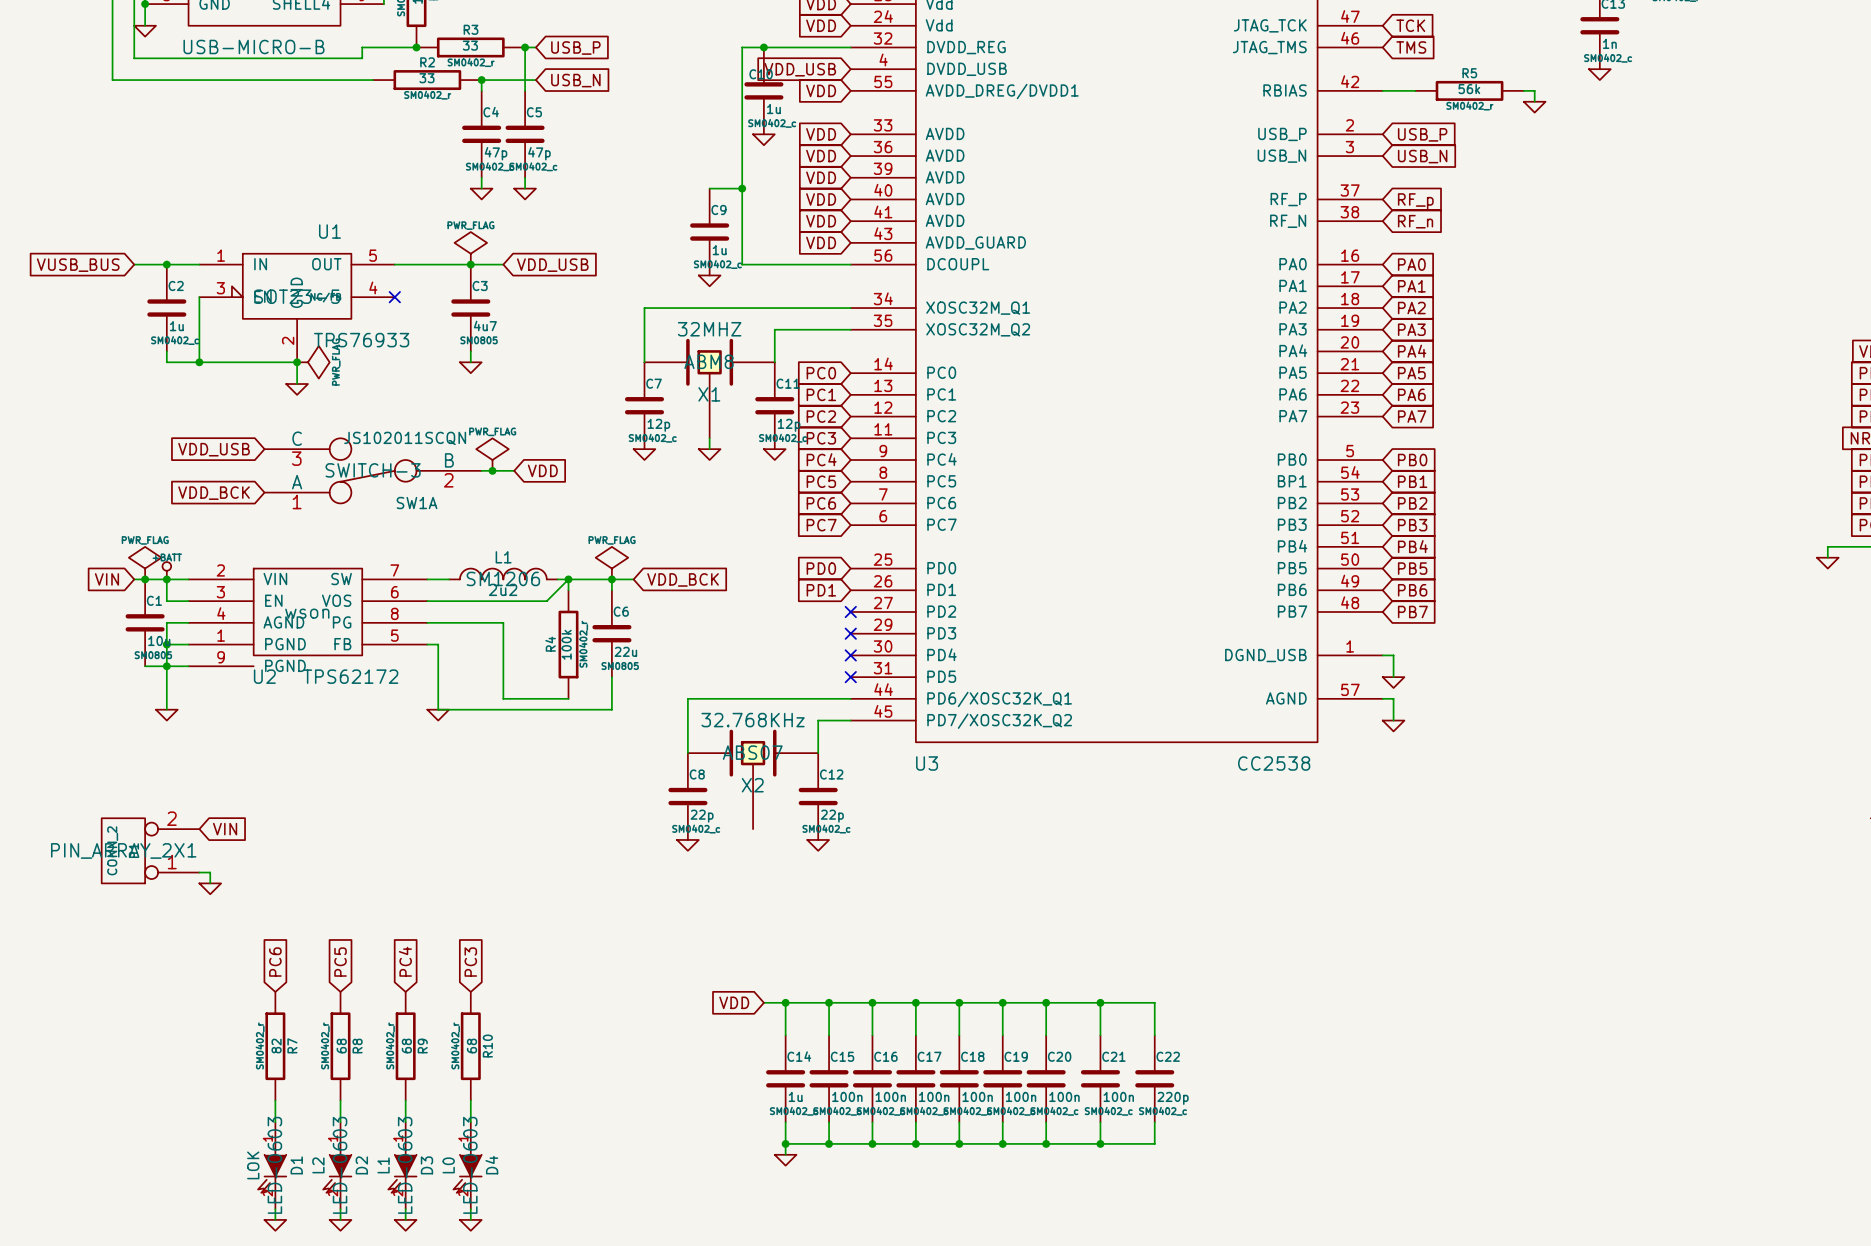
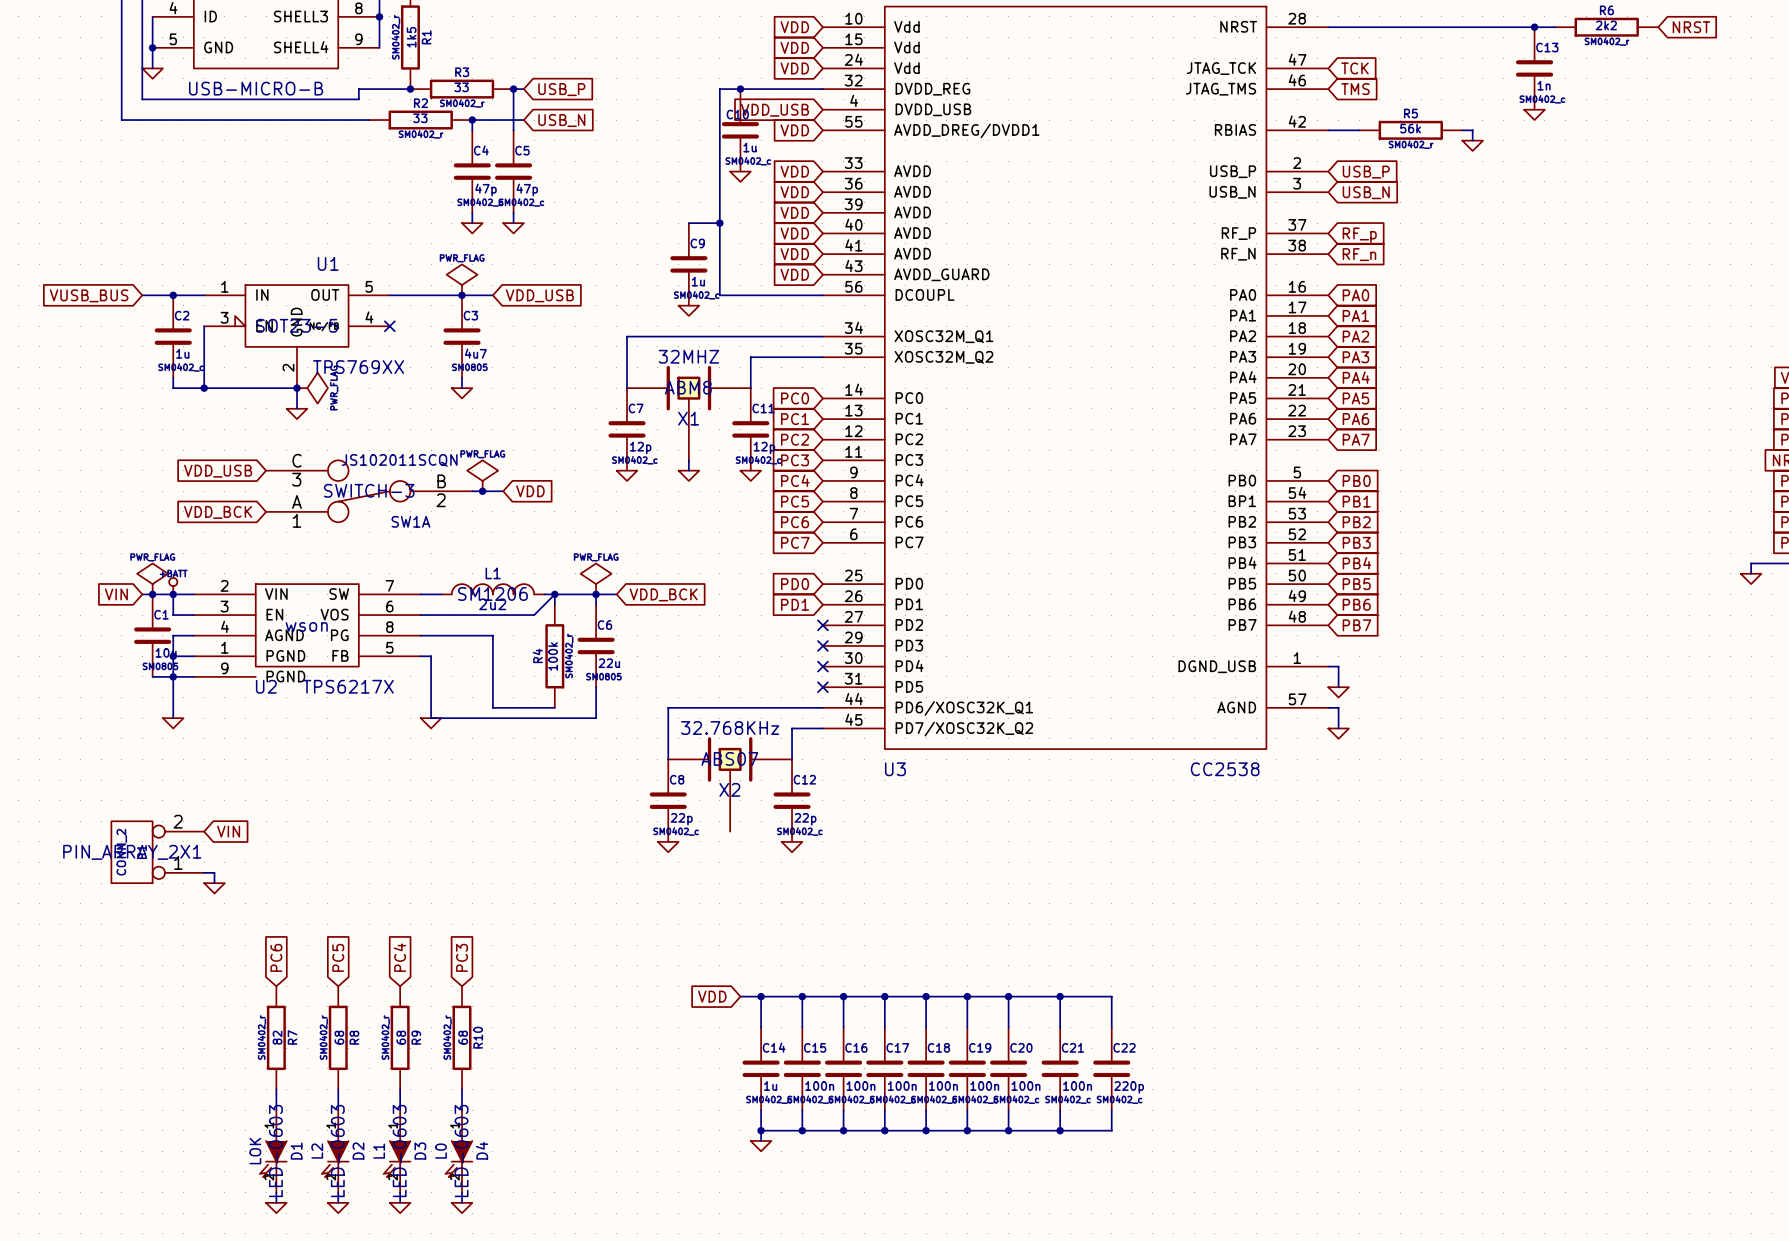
U1 value: TPS76933 (361, 340) -> TPS769XX (358, 367)
U2 value: TPS62172 (350, 676) -> TPS6217X (348, 686)

